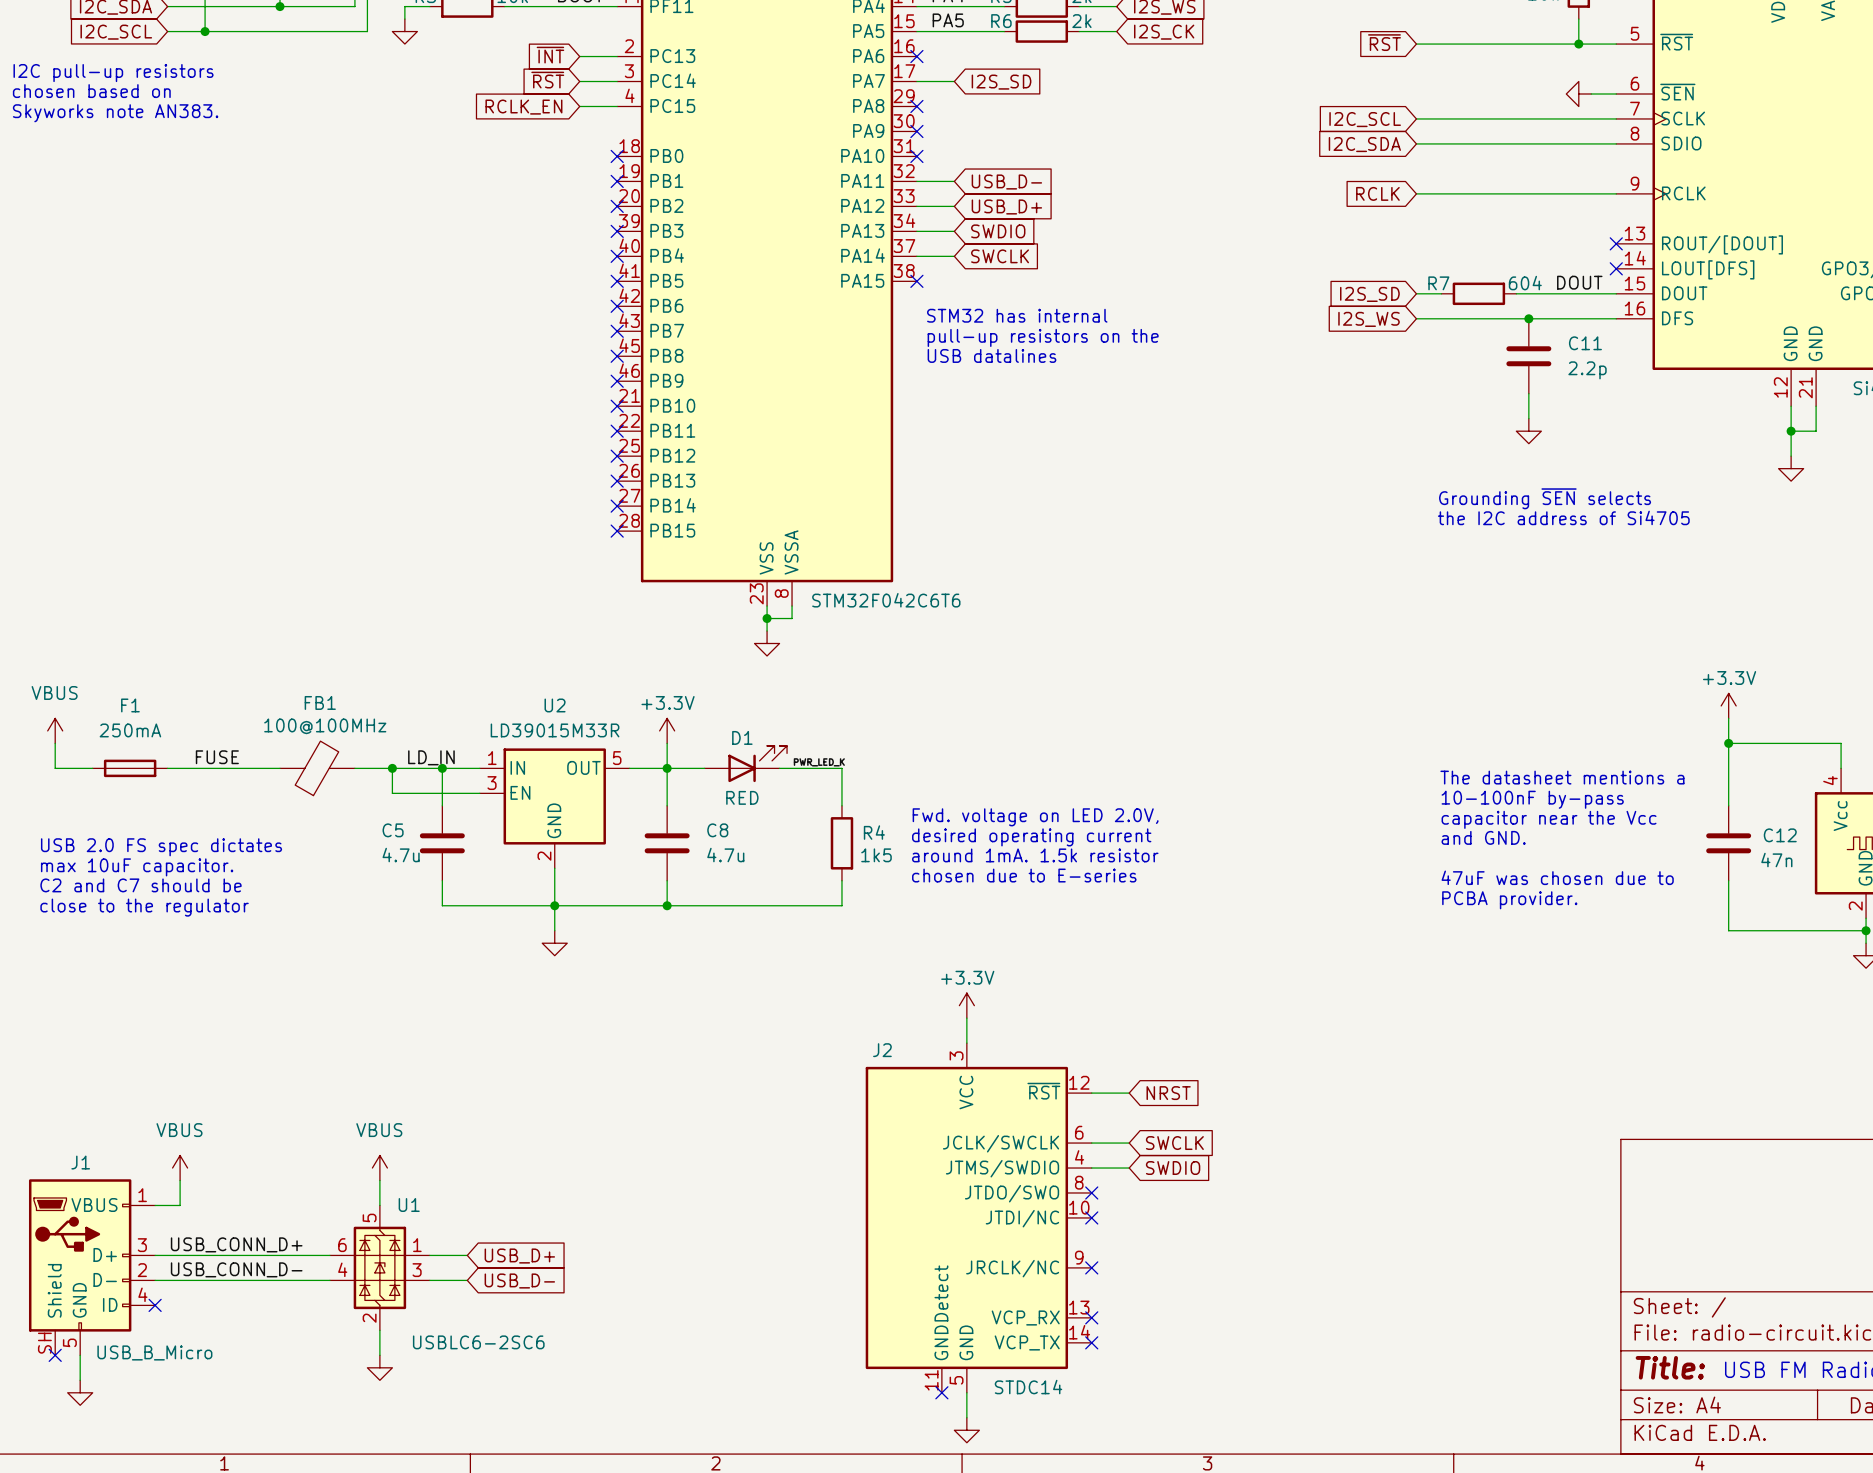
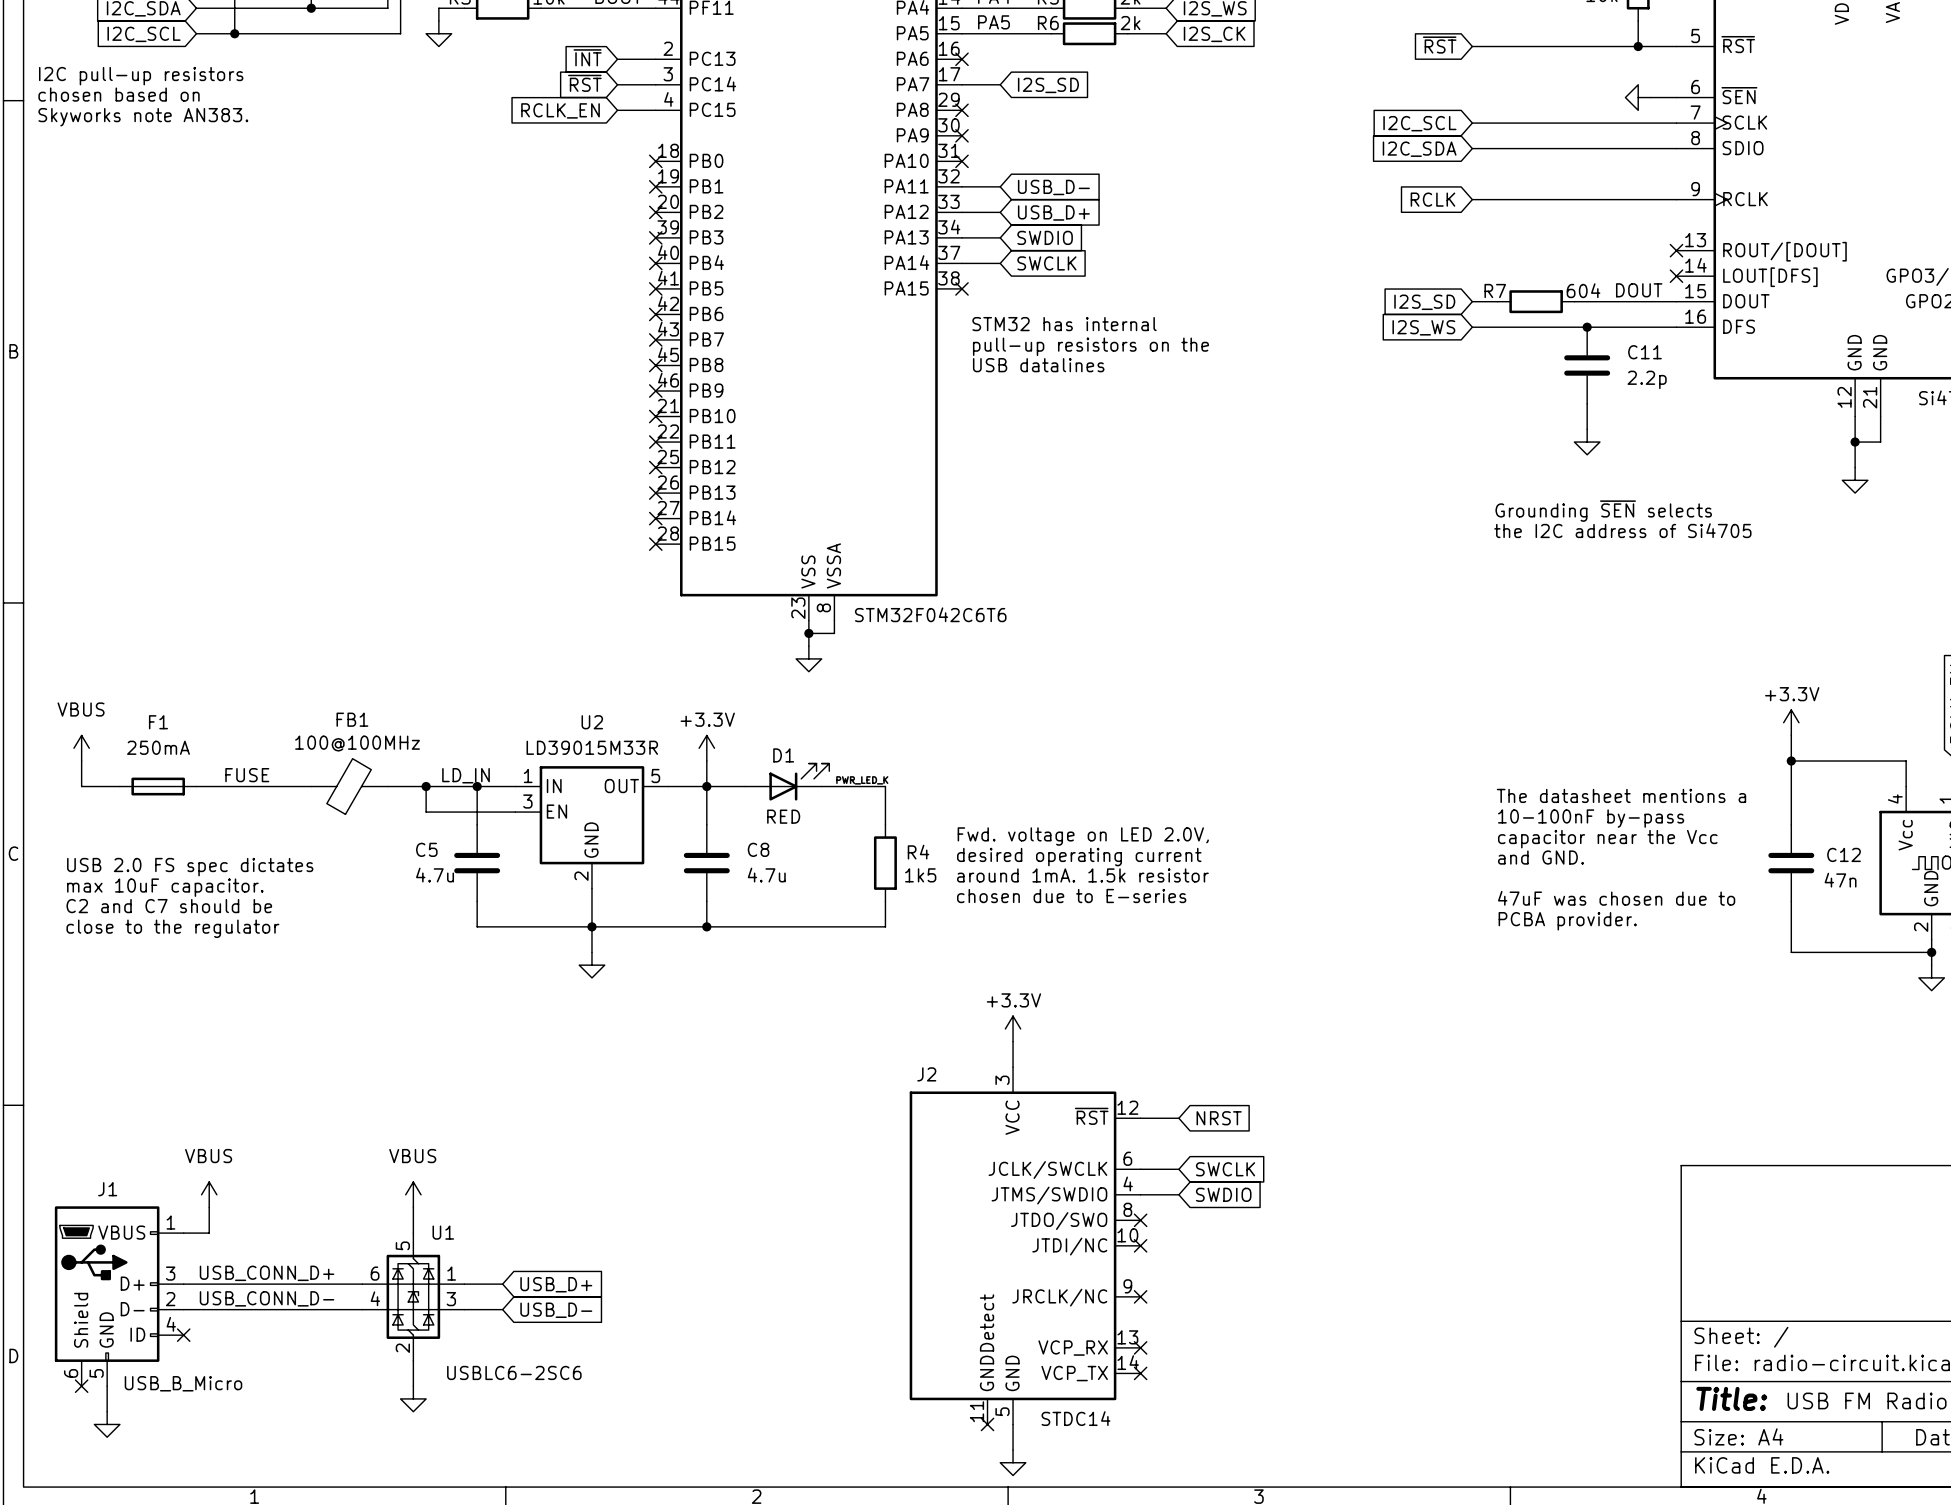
J1 pin number: SH (44, 1343) -> 6 (71, 1373)

